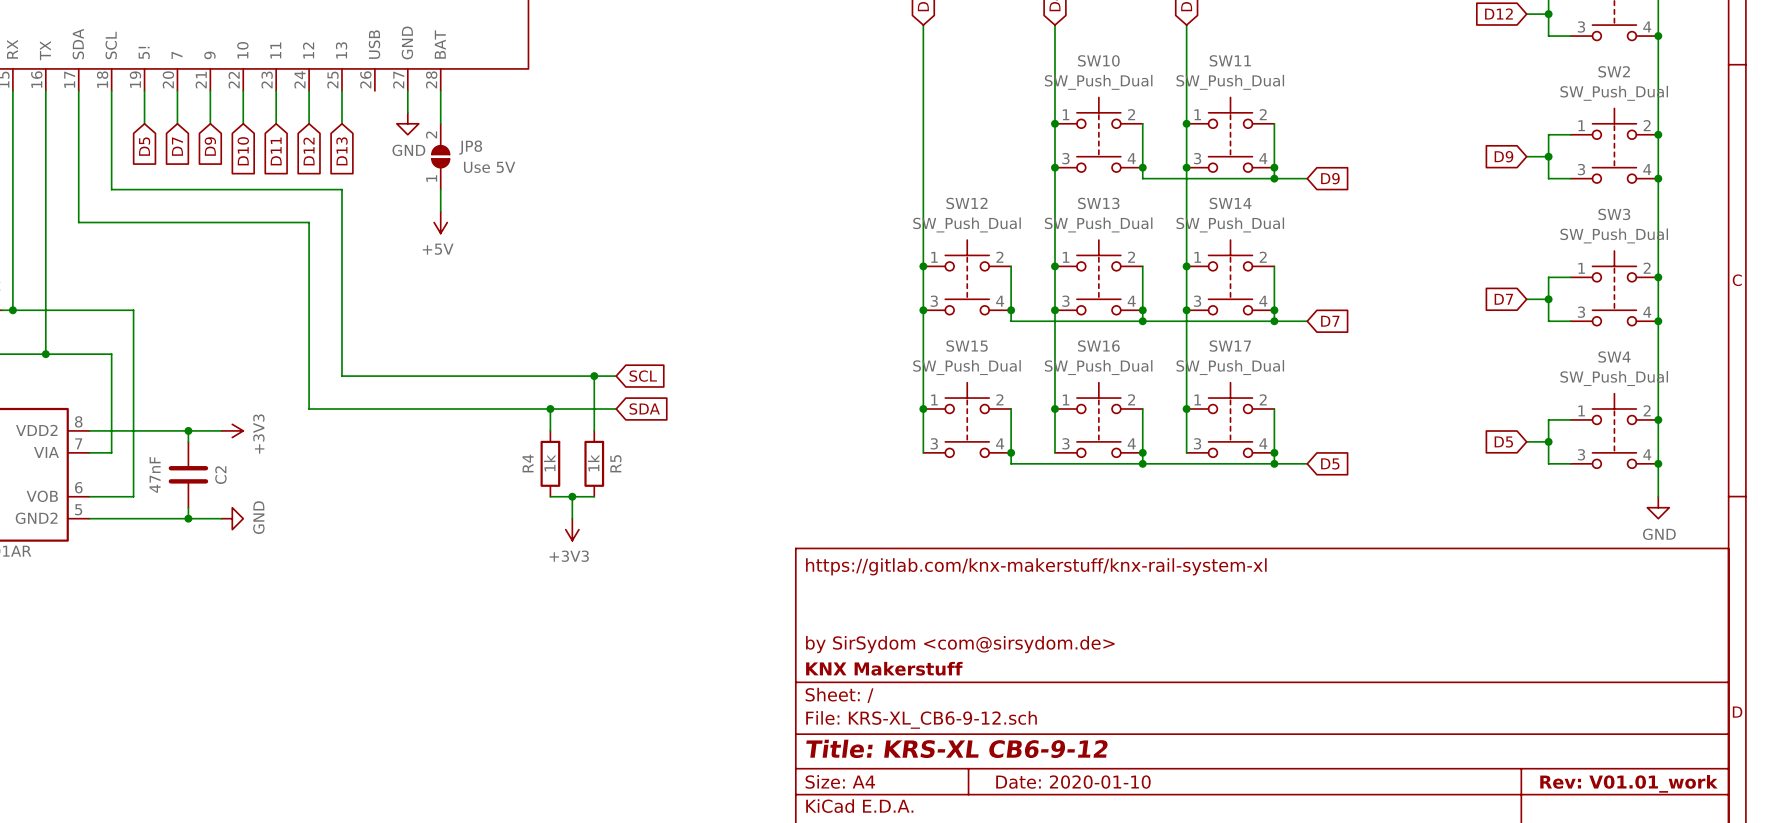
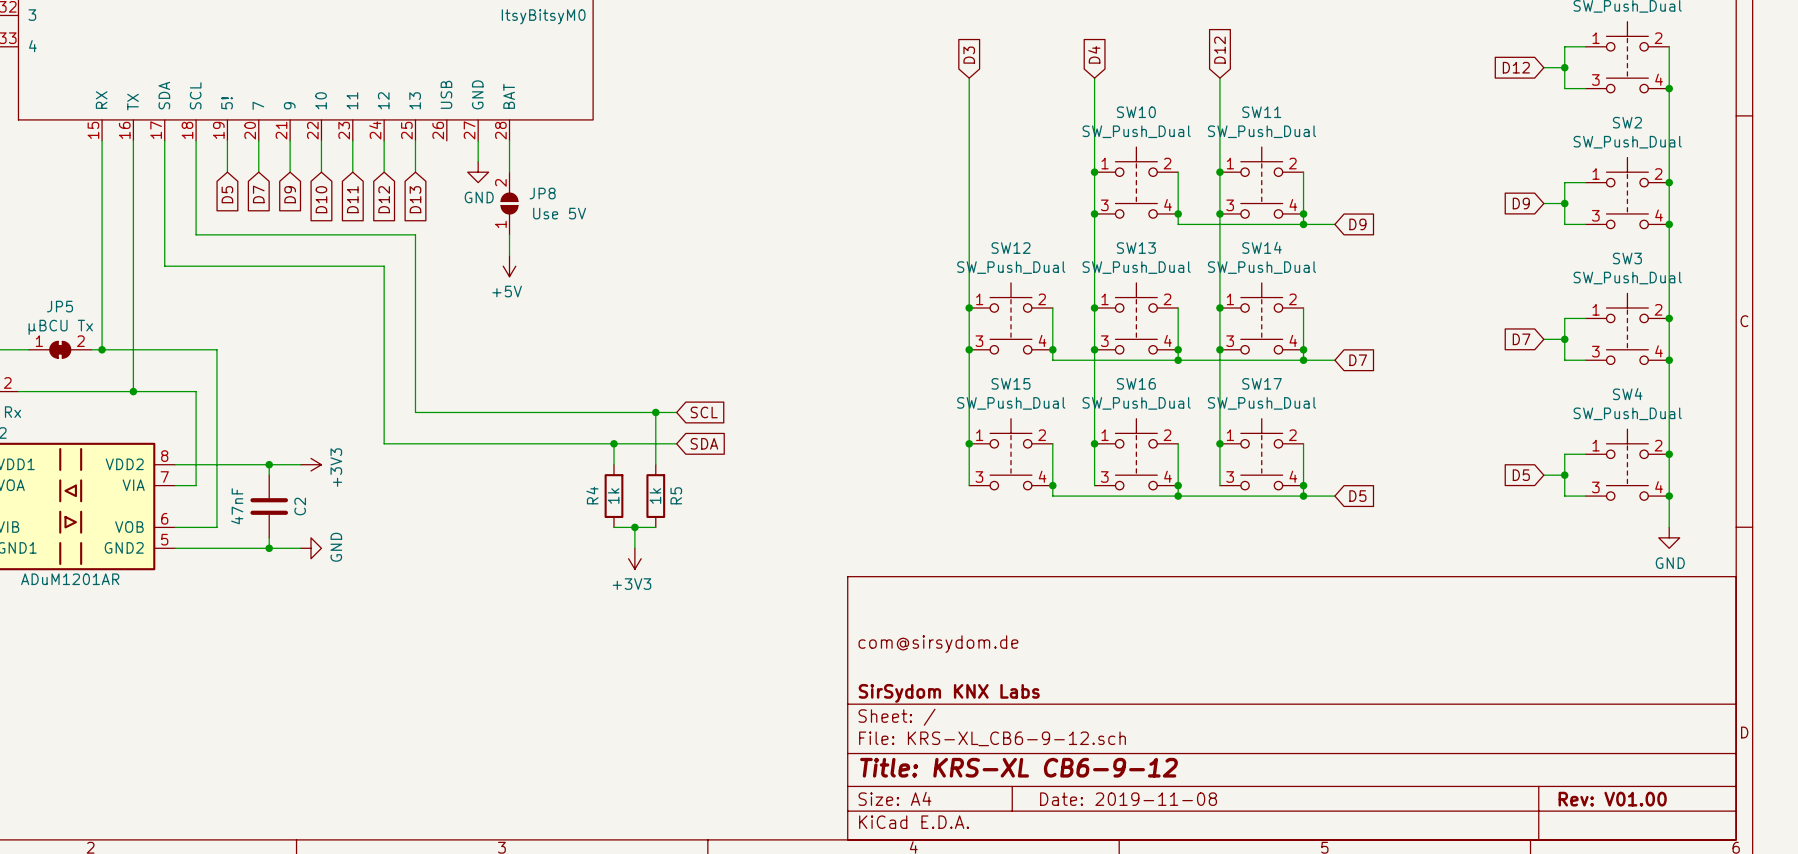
title block: https://gitlab.com/knx-makerstuff/knx-rail-system-xl (1036, 566) -> none
title block: by SirSydom <com@sirsydom.de> (960, 644) -> com@sirsydom.de (938, 644)
title block: KNX Makerstuff (884, 668) -> SirSydom KNX Labs (949, 693)
title block: Date: 2020-01-10 (1073, 782) -> Date: 2019-11-08 (1128, 799)
title block: Rev: V01.01_work (1628, 783) -> Rev: V01.00 (1612, 799)

